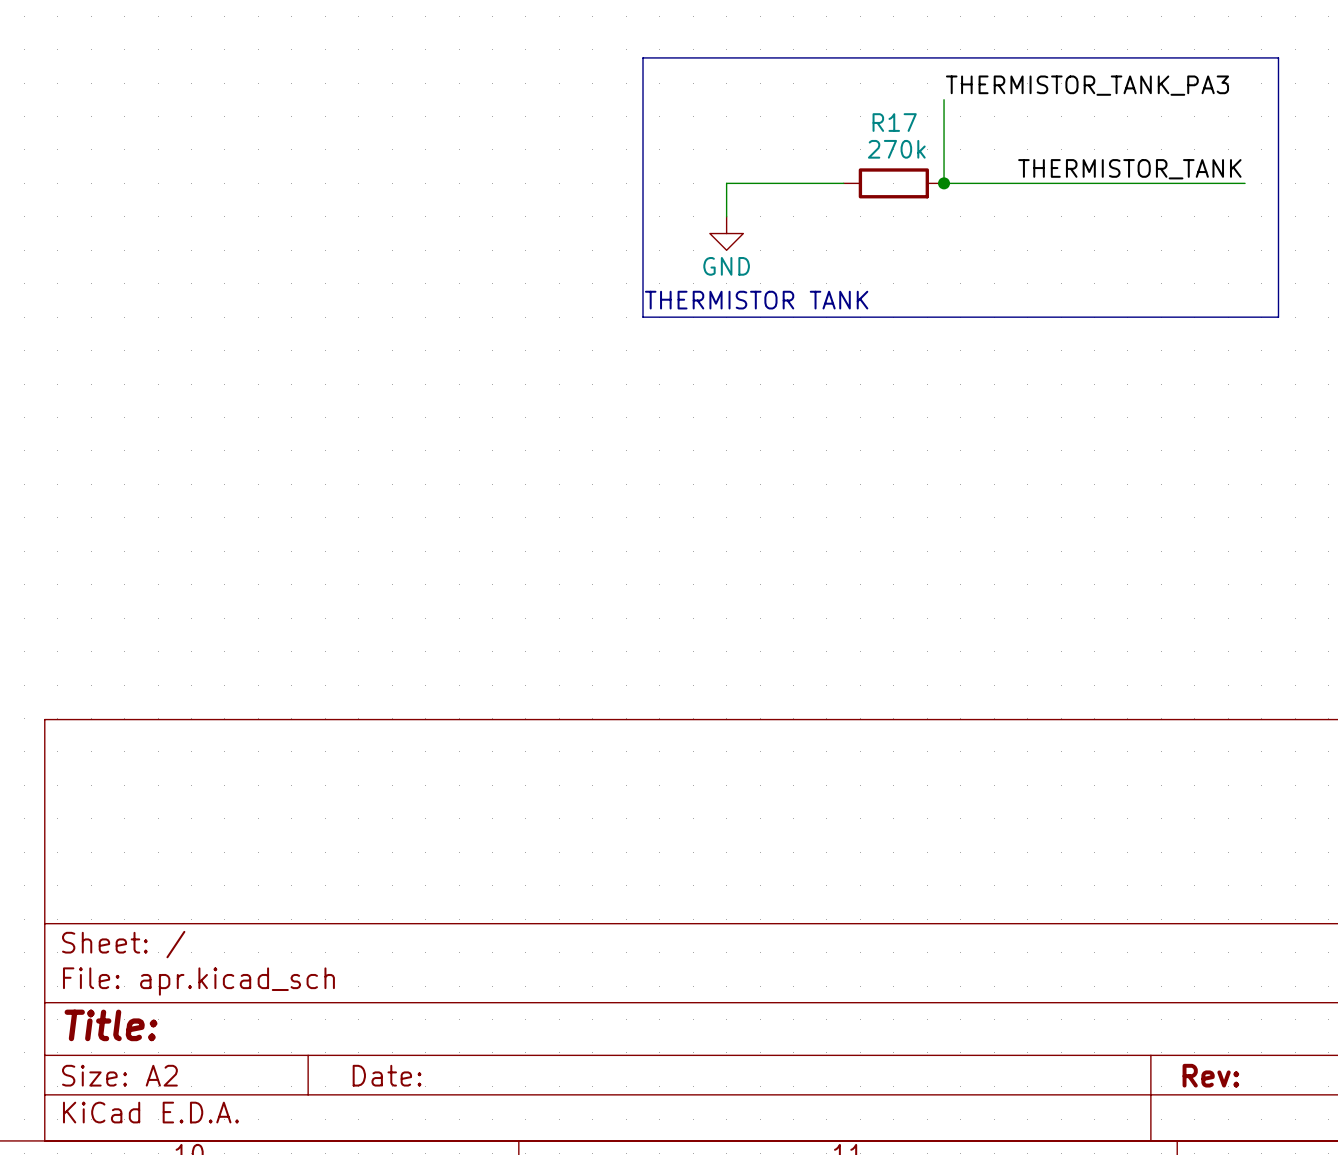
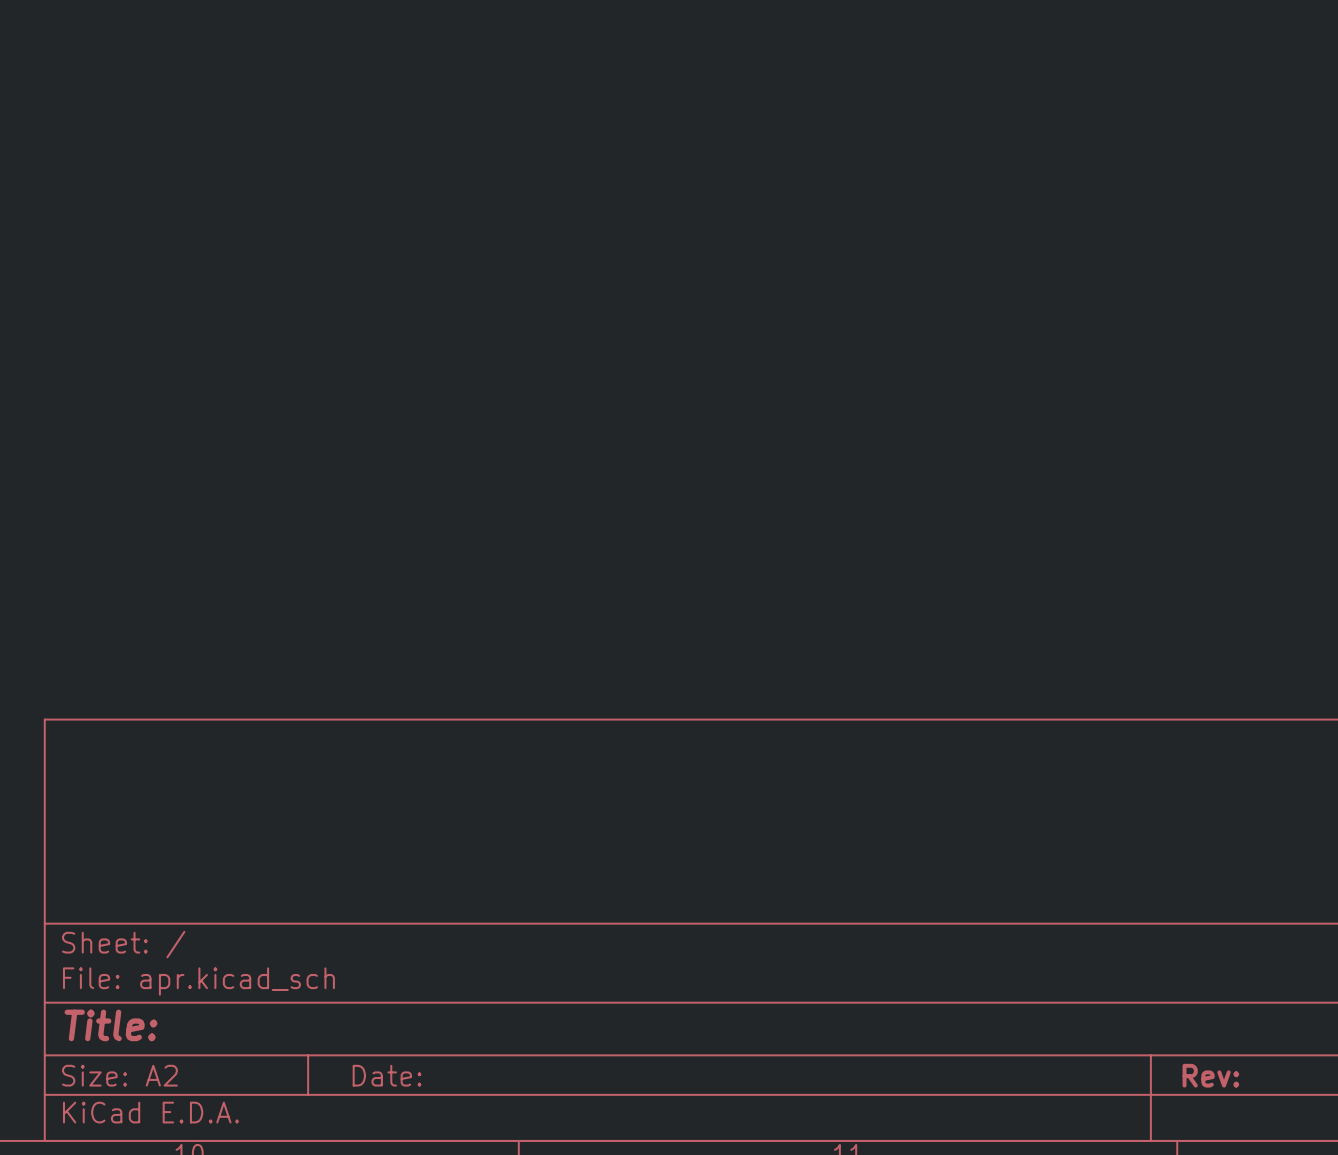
line: (643, 57) (1278, 57) (1278, 317) (643, 317) (643, 57) -> none
label: THERMISTOR_TANK_PA3 (1087, 85) -> none
wire: (944, 99) (944, 183) (1245, 183) -> none
label: THERMISTOR_TANK (1129, 169) -> none
wire: (843, 183) (726, 183) (726, 216) -> none
R17: 270k (893, 183) -> none
junction: (944, 183) -> none
power symbol: GND (726, 233) -> none
text: THERMISTOR TANK (756, 300) -> none

